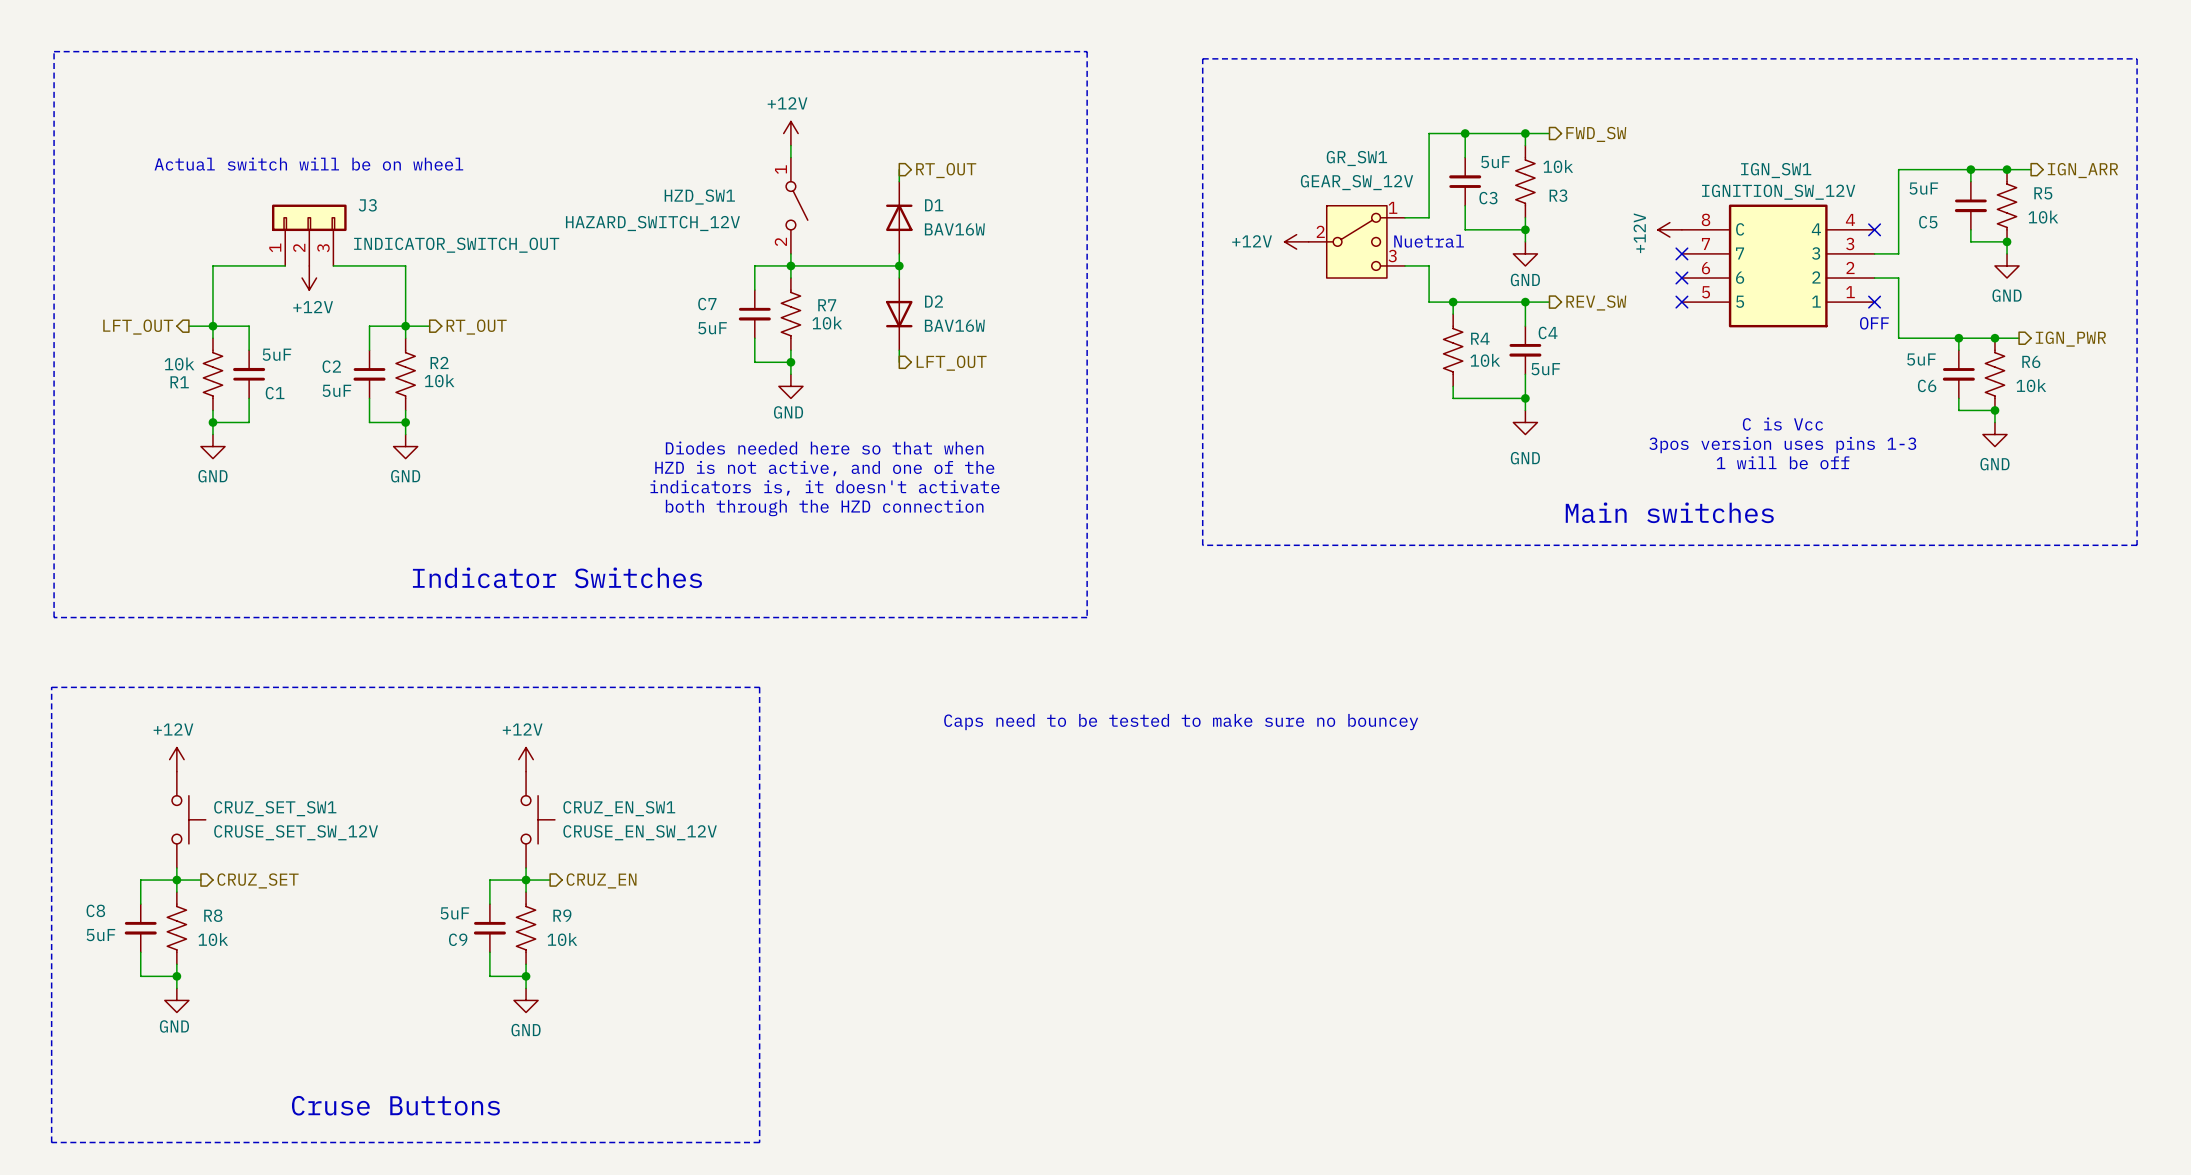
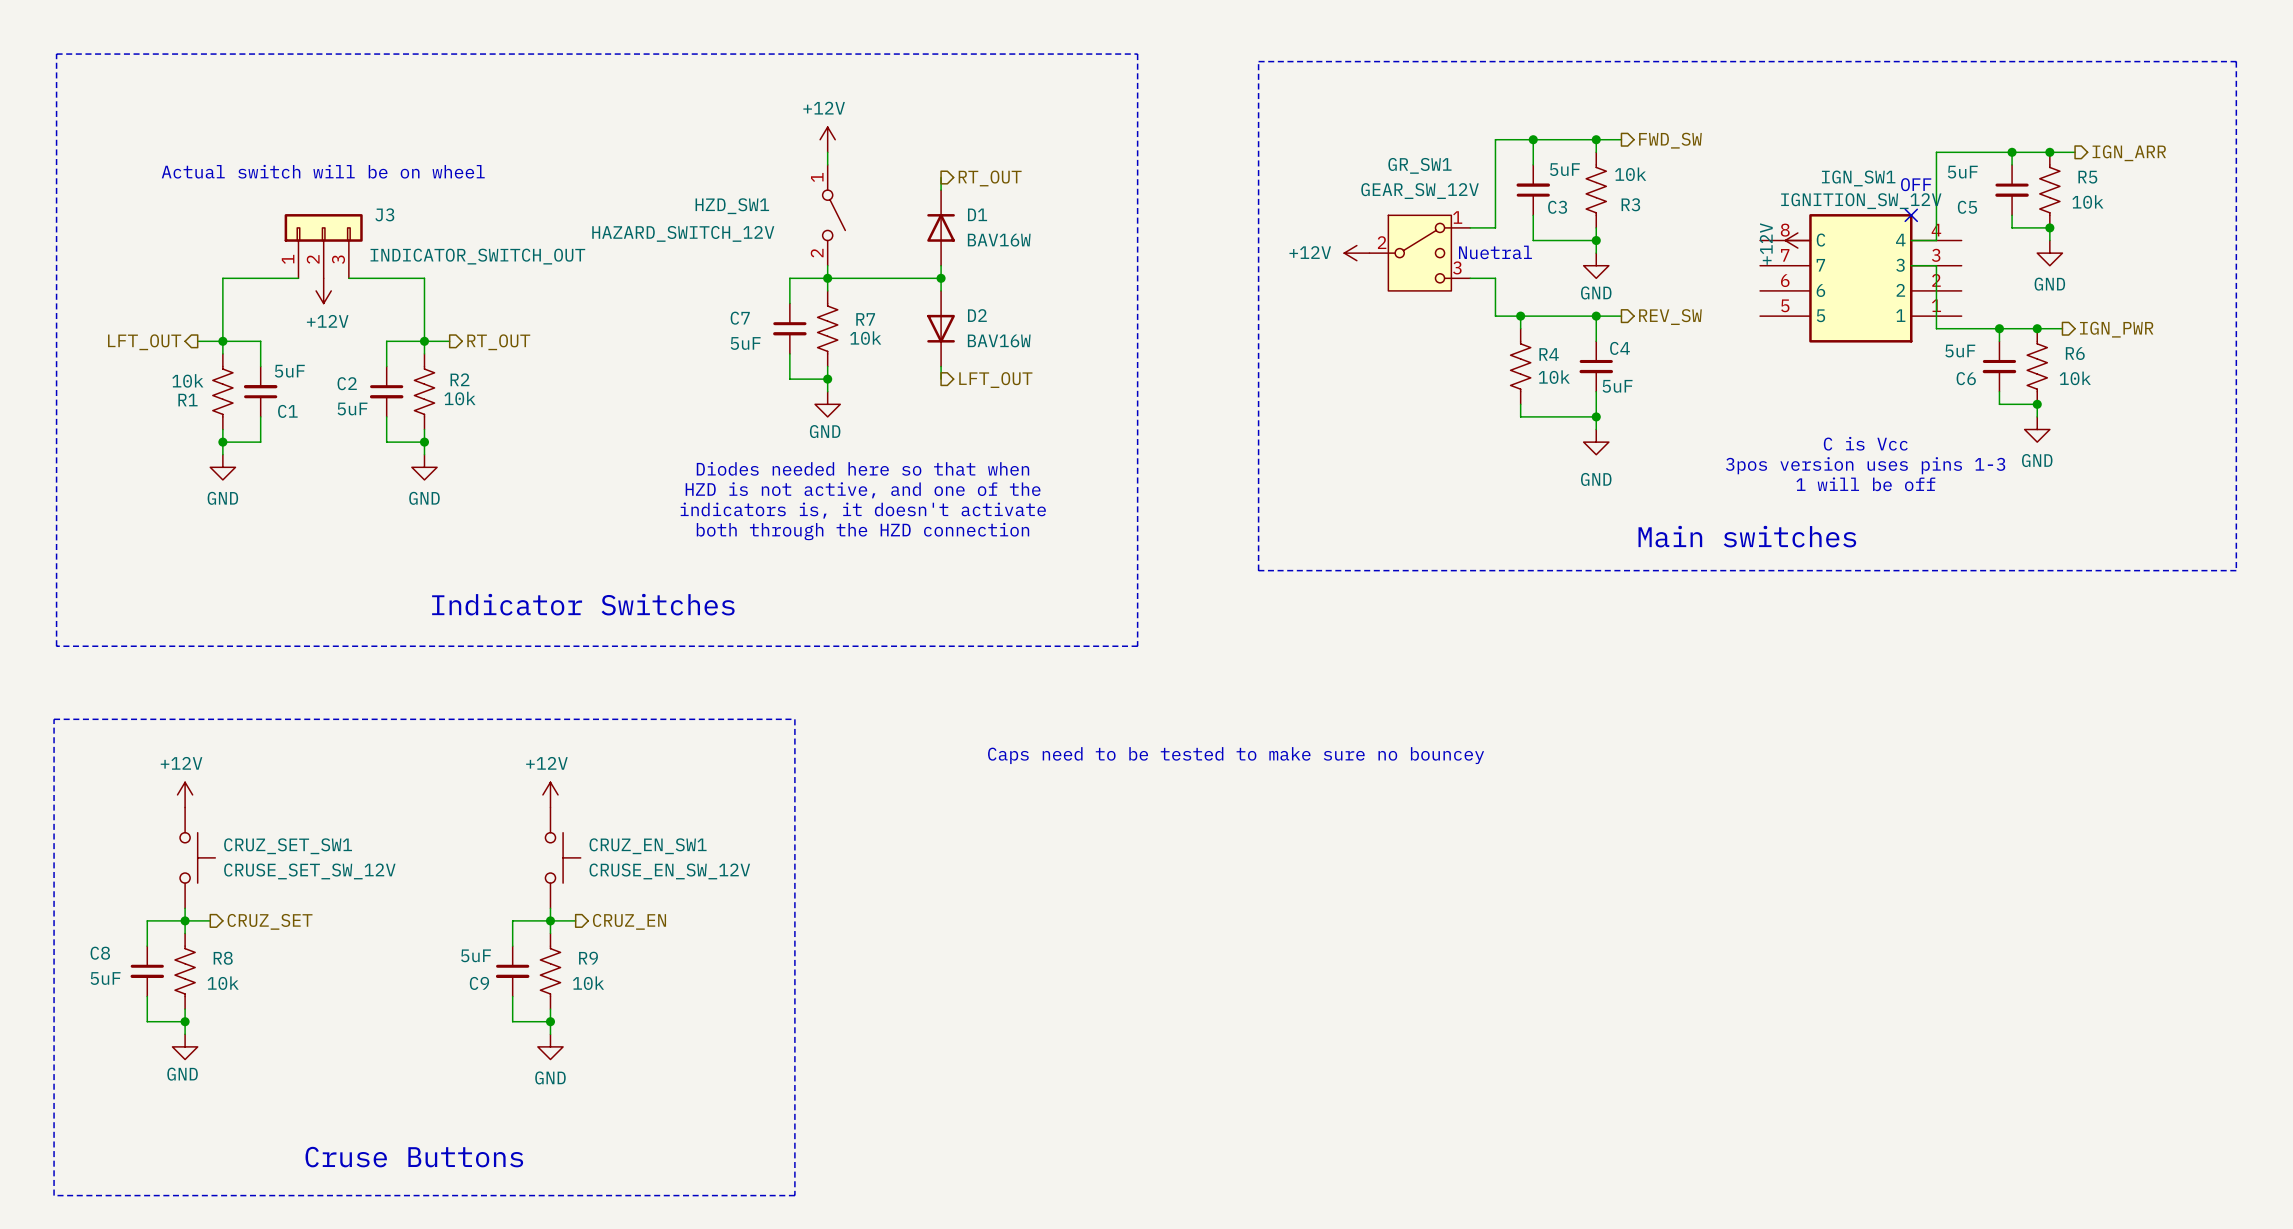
junction: none -> (2012, 152)
junction: none -> (2049, 152)
wire: (1970, 169) (1970, 181) -> (2012, 152) (2012, 164)
junction: (1970, 169) -> none
junction: (2007, 169) -> none
wire: (2031, 169) (1898, 169) (1898, 253) (1874, 253) -> (2075, 152) (1936, 152) (1936, 240) (1911, 240)
hierarchical label position: IGN_ARR (2082, 170) -> IGN_ARR (2129, 153)
no-connect mark: none -> (1911, 215)
C5 position: (1970, 205) -> (2012, 190)
R5 position: (2007, 205) -> (2049, 190)
junction: none -> (2049, 227)
power symbol position: +12V (1669, 229) -> +12V (1797, 240)
no-connect mark: (1874, 229) -> none
wire: (1970, 229) (1970, 241) (2007, 241) (2007, 253) -> (2012, 215) (2012, 227) (2049, 227) (2049, 240)
junction: (2007, 241) -> none
no-connect mark: (1681, 253) -> none
power symbol position: GND (2007, 265) -> GND (2049, 253)
no-connect mark: (1681, 278) -> none
wire: (1874, 278) (1898, 278) (1898, 338) (2019, 338) -> (1911, 265) (1936, 265) (1936, 328) (2062, 328)
no-connect mark: (1681, 302) -> none
no-connect mark: (1874, 302) -> none
junction: none -> (1999, 328)
junction: none -> (2037, 328)
text position: OFF (1874, 323) -> OFF (1916, 184)
wire: (1958, 338) (1958, 350) -> (1999, 328) (1999, 341)
junction: (1958, 338) -> none
junction: (1994, 338) -> none
hierarchical label position: IGN_PWR (2070, 339) -> IGN_PWR (2116, 329)
C6 position: (1958, 374) -> (1999, 366)
R6 position: (1994, 374) -> (2037, 366)
junction: none -> (2037, 404)
wire: (1958, 398) (1958, 410) (1994, 410) (1994, 422) -> (1999, 391) (1999, 404) (2037, 404) (2037, 416)
junction: (1994, 410) -> none
power symbol position: GND (1994, 434) -> GND (2037, 429)

